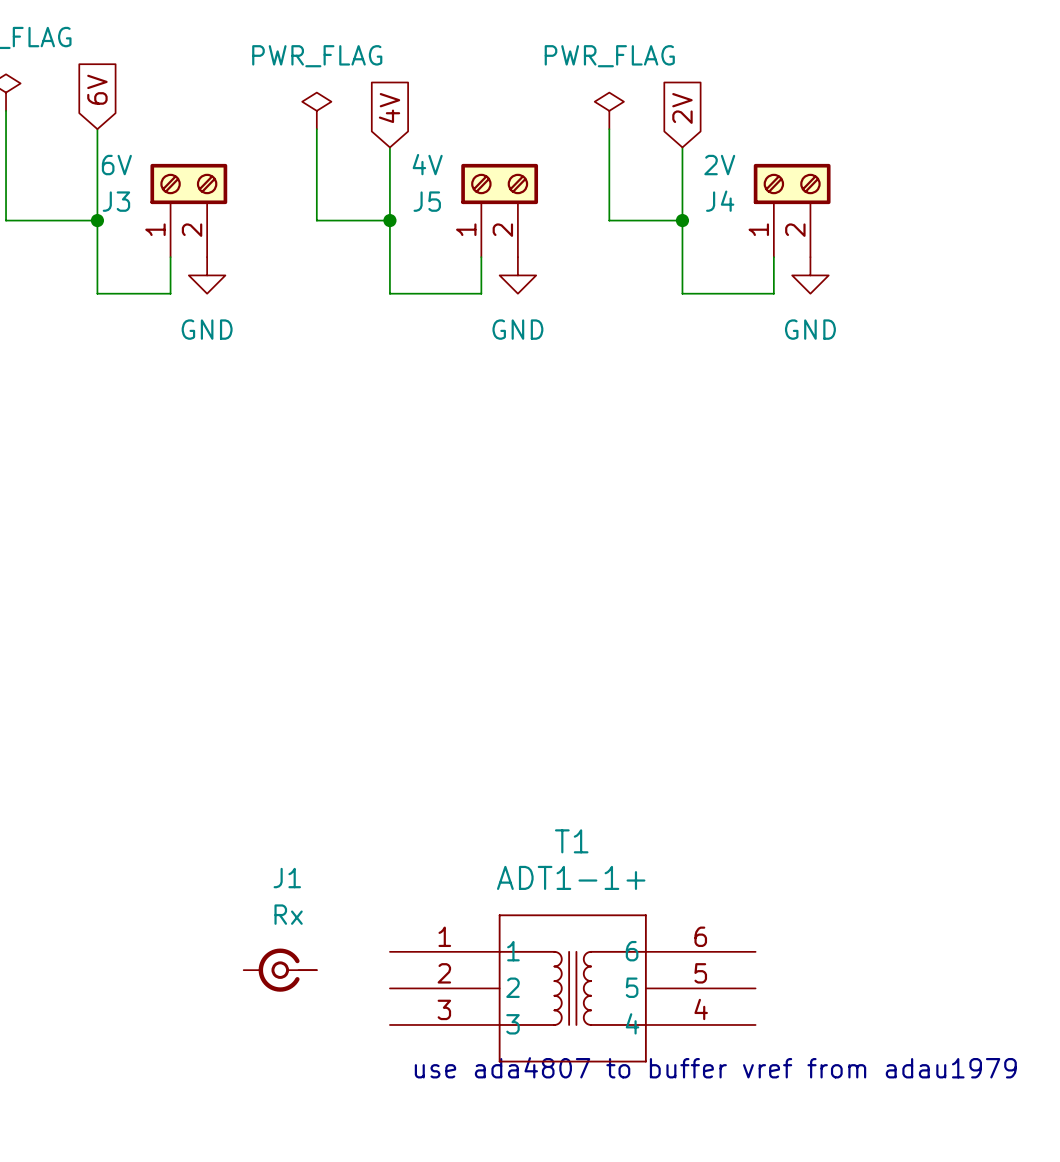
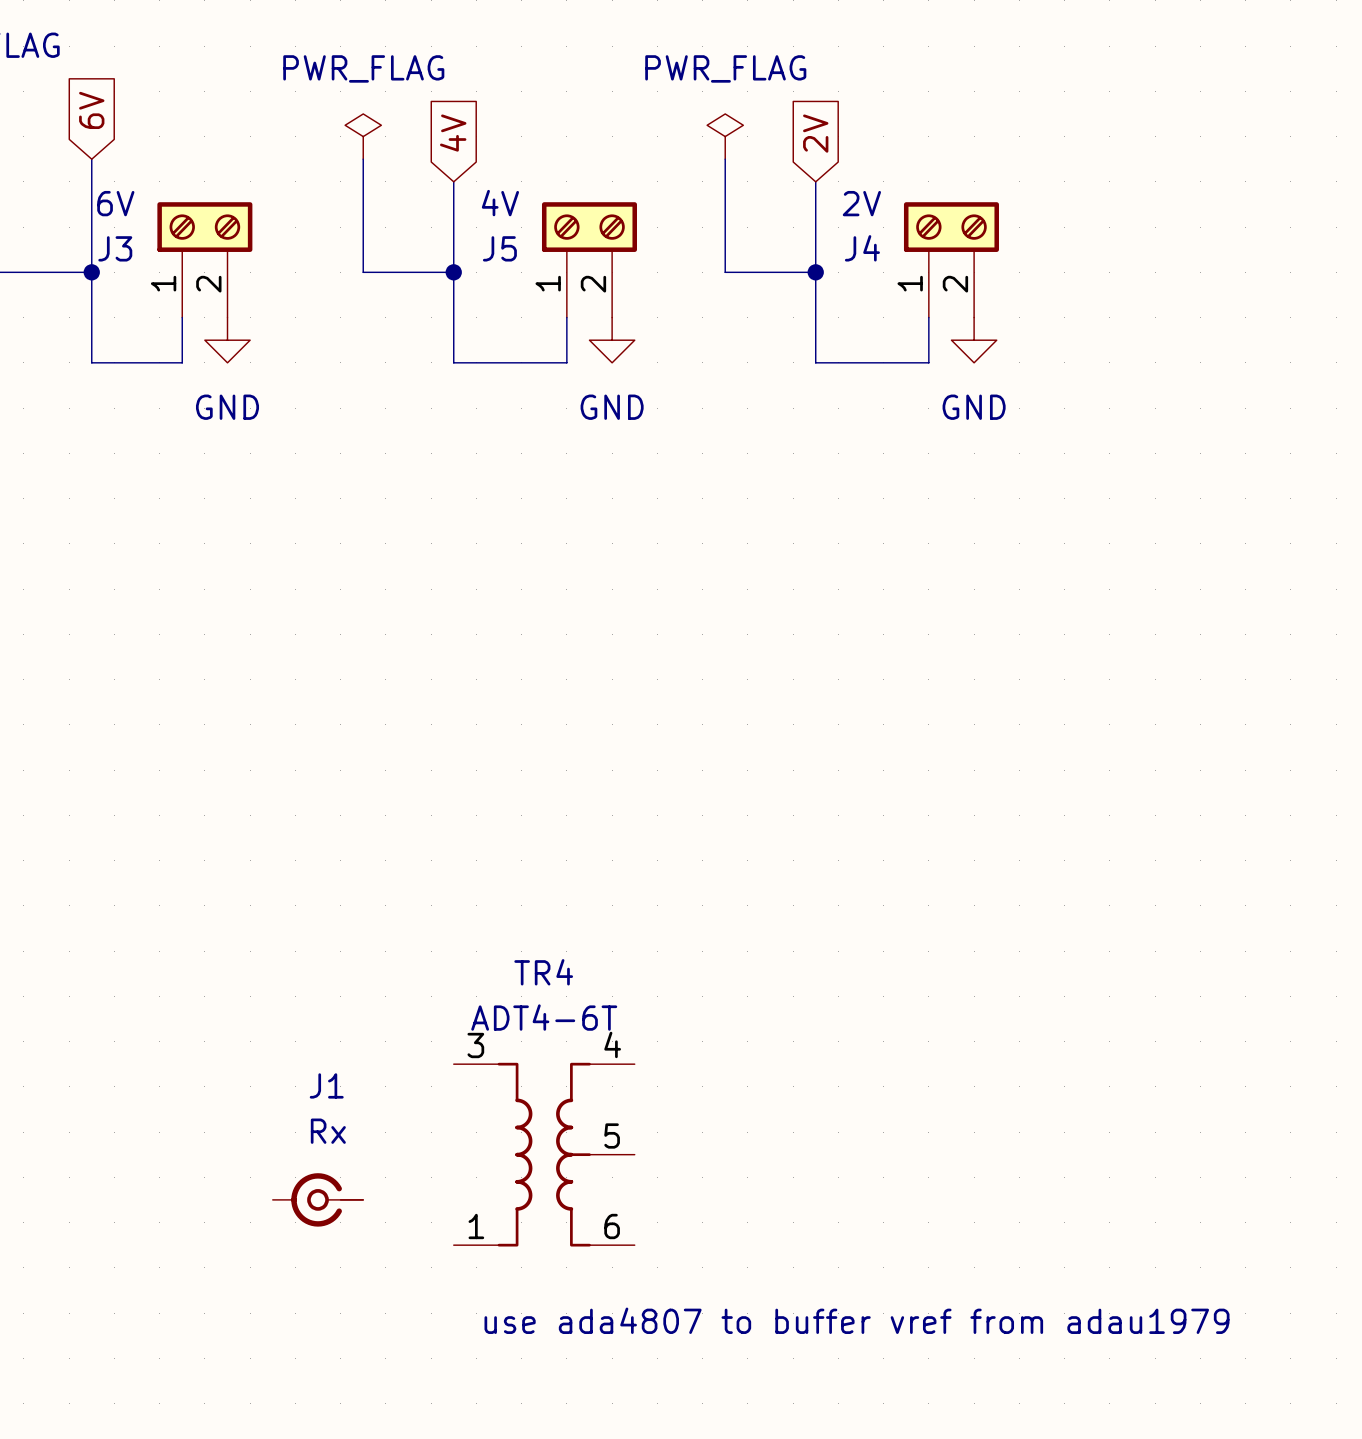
TR4: none -> ADT4-6T (544, 1154)
T1: ADT1-1+ (572, 988) -> none

